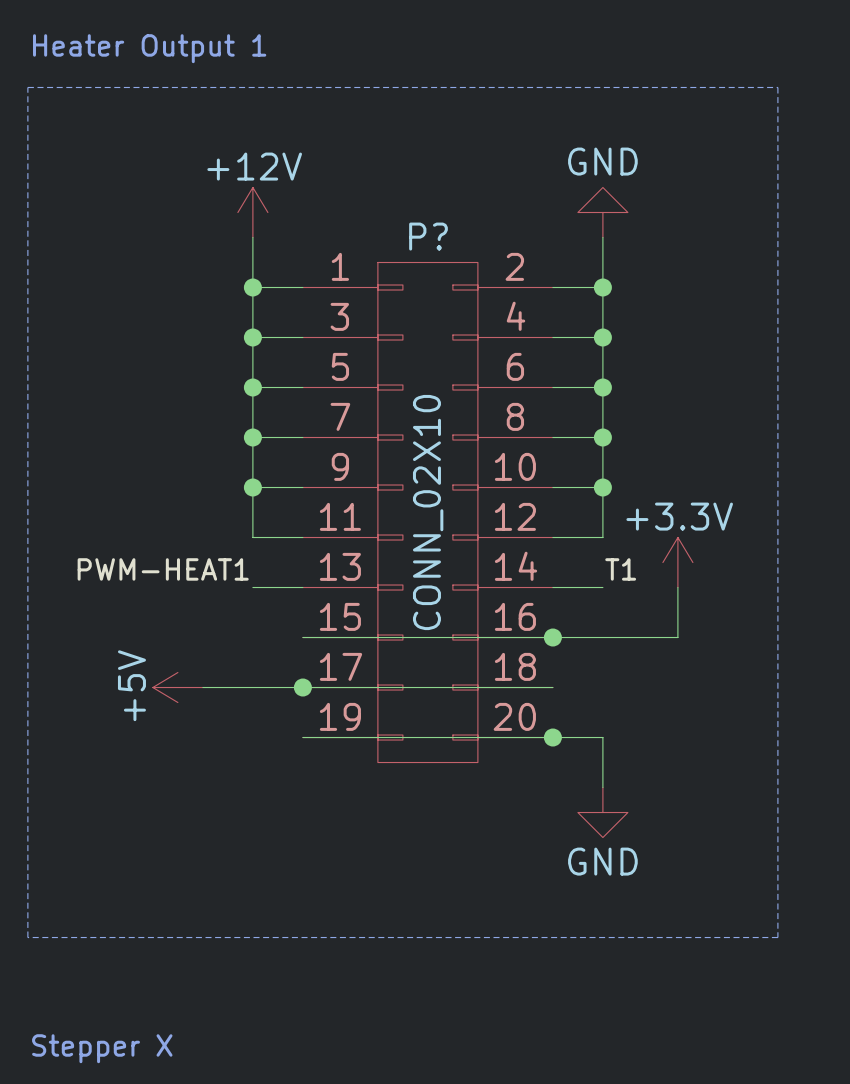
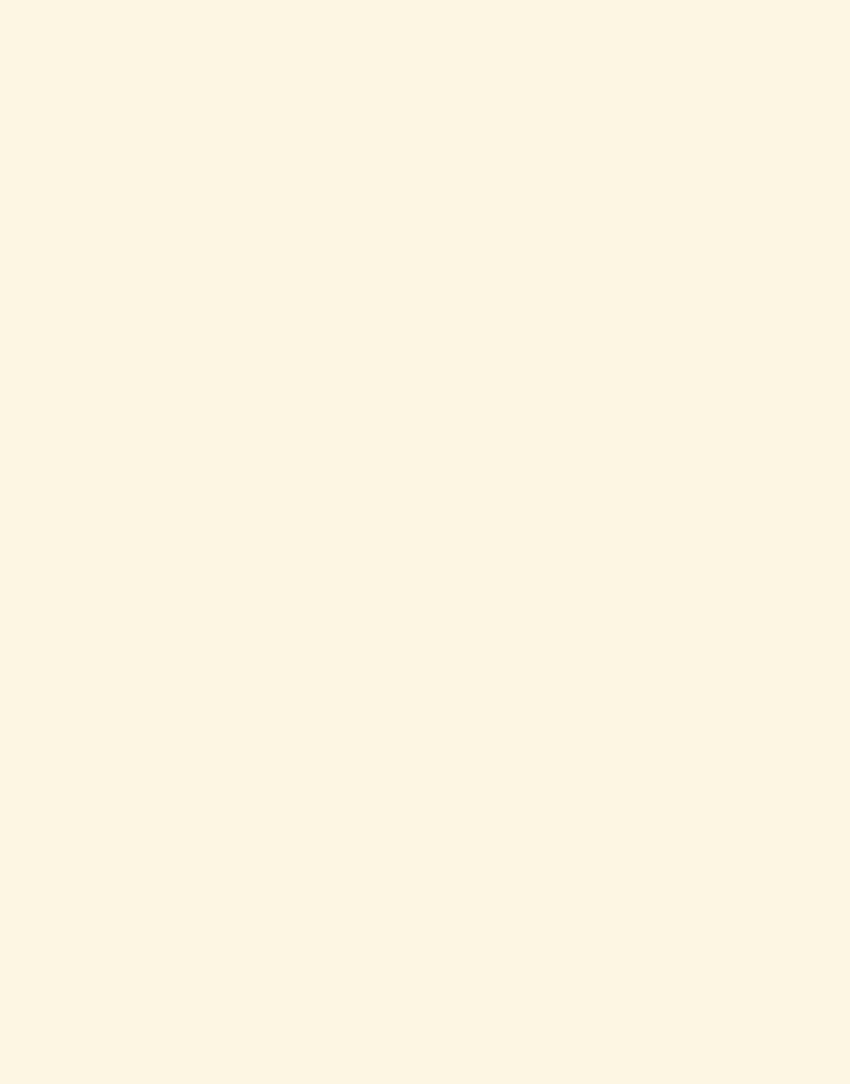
text: Heater Output 1 (149, 48) -> none
line: (27, 87) (27, 937) (777, 937) (777, 87) (27, 87) -> none
power symbol: +12V (252, 212) -> none
power symbol: GND (602, 212) -> none
wire: (252, 237) (252, 537) (302, 537) -> none
wire: (602, 237) (602, 537) (552, 537) -> none
wire: (252, 287) (302, 287) -> none
junction: (252, 287) -> none
wire: (552, 287) (602, 287) -> none
junction: (602, 287) -> none
wire: (252, 337) (302, 337) -> none
junction: (252, 337) -> none
wire: (552, 337) (602, 337) -> none
junction: (602, 337) -> none
wire: (252, 387) (302, 387) -> none
junction: (252, 387) -> none
wire: (552, 387) (602, 387) -> none
junction: (602, 387) -> none
wire: (252, 437) (302, 437) -> none
junction: (252, 437) -> none
wire: (552, 437) (602, 437) -> none
junction: (602, 437) -> none
wire: (252, 487) (302, 487) -> none
junction: (252, 487) -> none
wire: (552, 487) (602, 487) -> none
junction: (602, 487) -> none
P?: CONN_02X10 (427, 512) -> none
power symbol: +3.3V (677, 562) -> none
label: PWM-HEAT1 (163, 569) -> none
label: T1 (620, 569) -> none
wire: (252, 587) (302, 587) -> none
wire: (552, 587) (602, 587) -> none
wire: (677, 587) (677, 637) (302, 637) -> none
junction: (552, 637) -> none
power symbol: +5V (177, 687) -> none
wire: (202, 687) (552, 687) -> none
junction: (302, 687) -> none
wire: (302, 737) (602, 737) (602, 787) -> none
junction: (552, 737) -> none
power symbol: GND (602, 812) -> none
text: Stepper X (102, 1048) -> none

